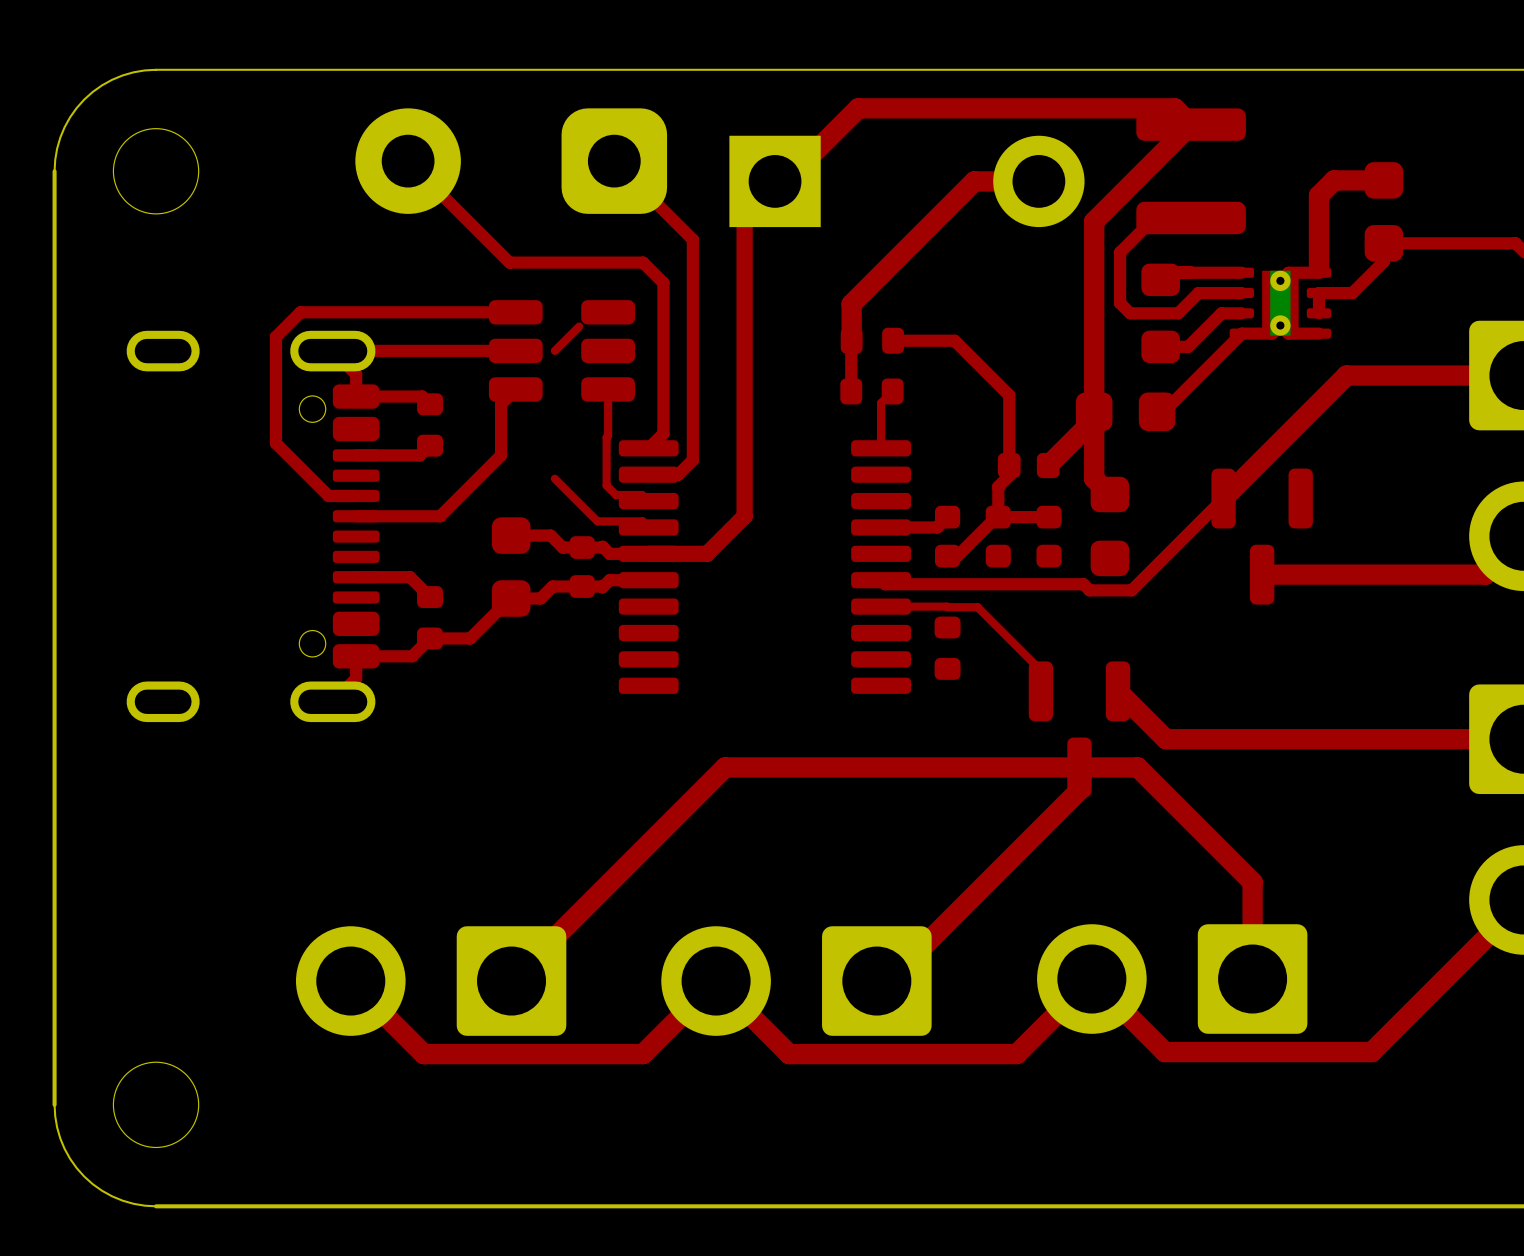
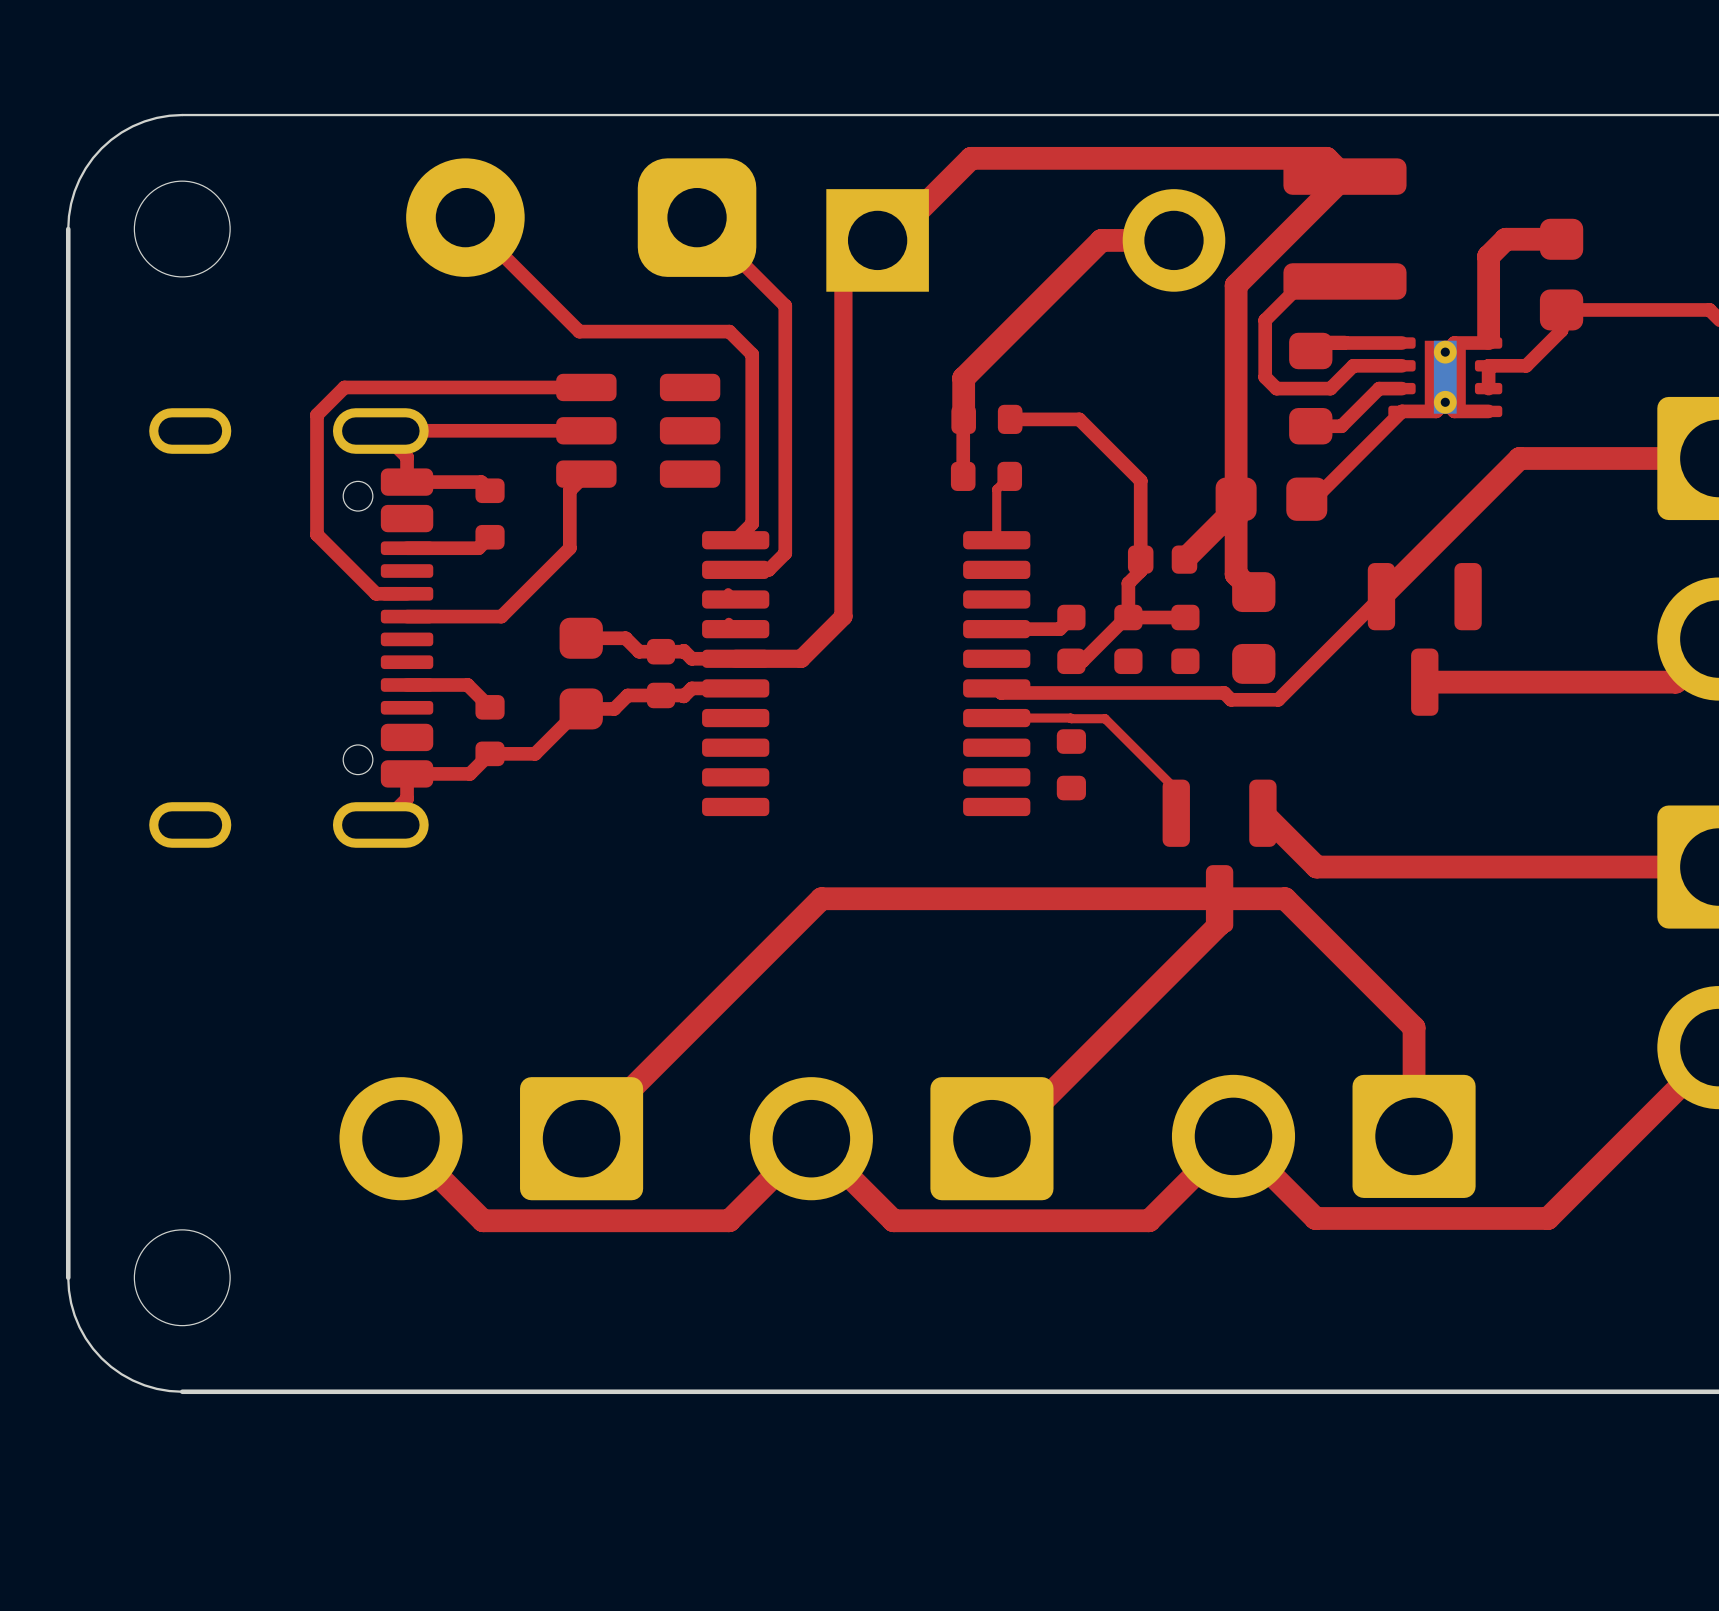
top track: (579, 326) (554, 350) -> none
top track: (608, 389) (606, 485) (616, 494) (642, 494) -> none
top track: (554, 478) (597, 521) (642, 521) -> none

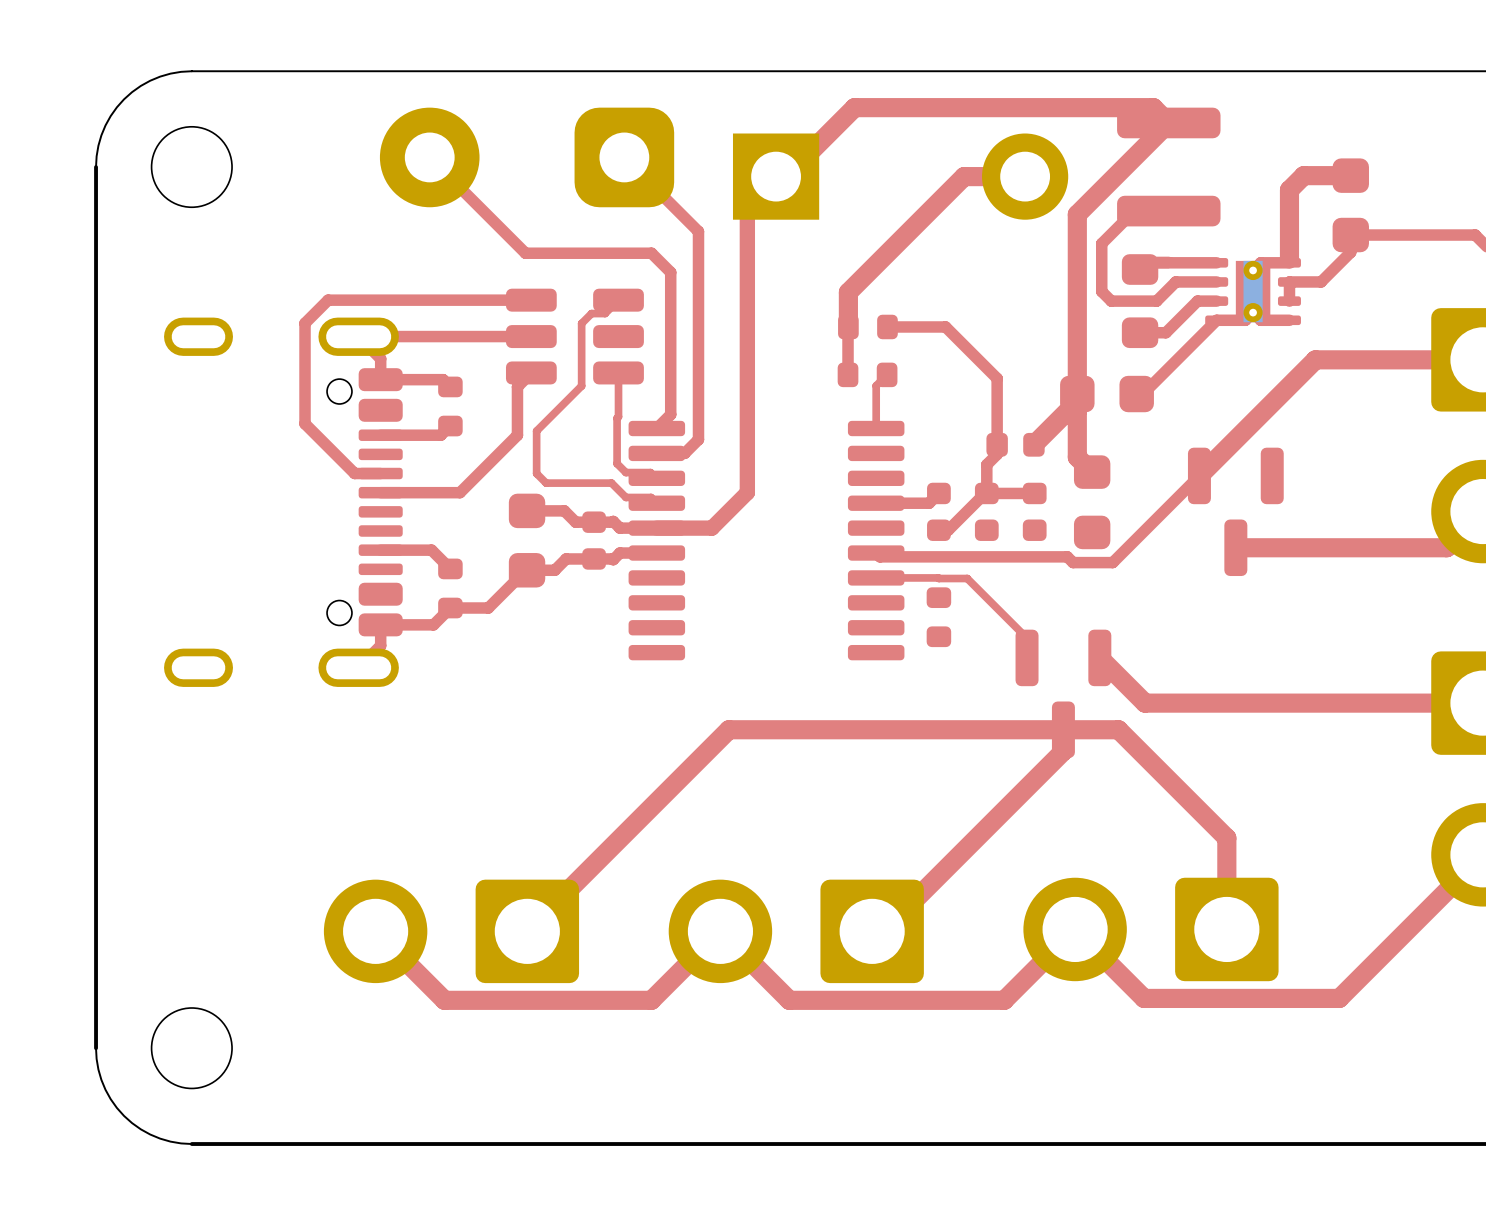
top track: none -> (618, 300) (605, 313) (591, 313) (581, 323) (581, 386) (536, 431) (536, 473) (546, 483) (611, 483) (625, 497) (651, 497)
top track: none -> (618, 372) (617, 463) (625, 472) (650, 472)

